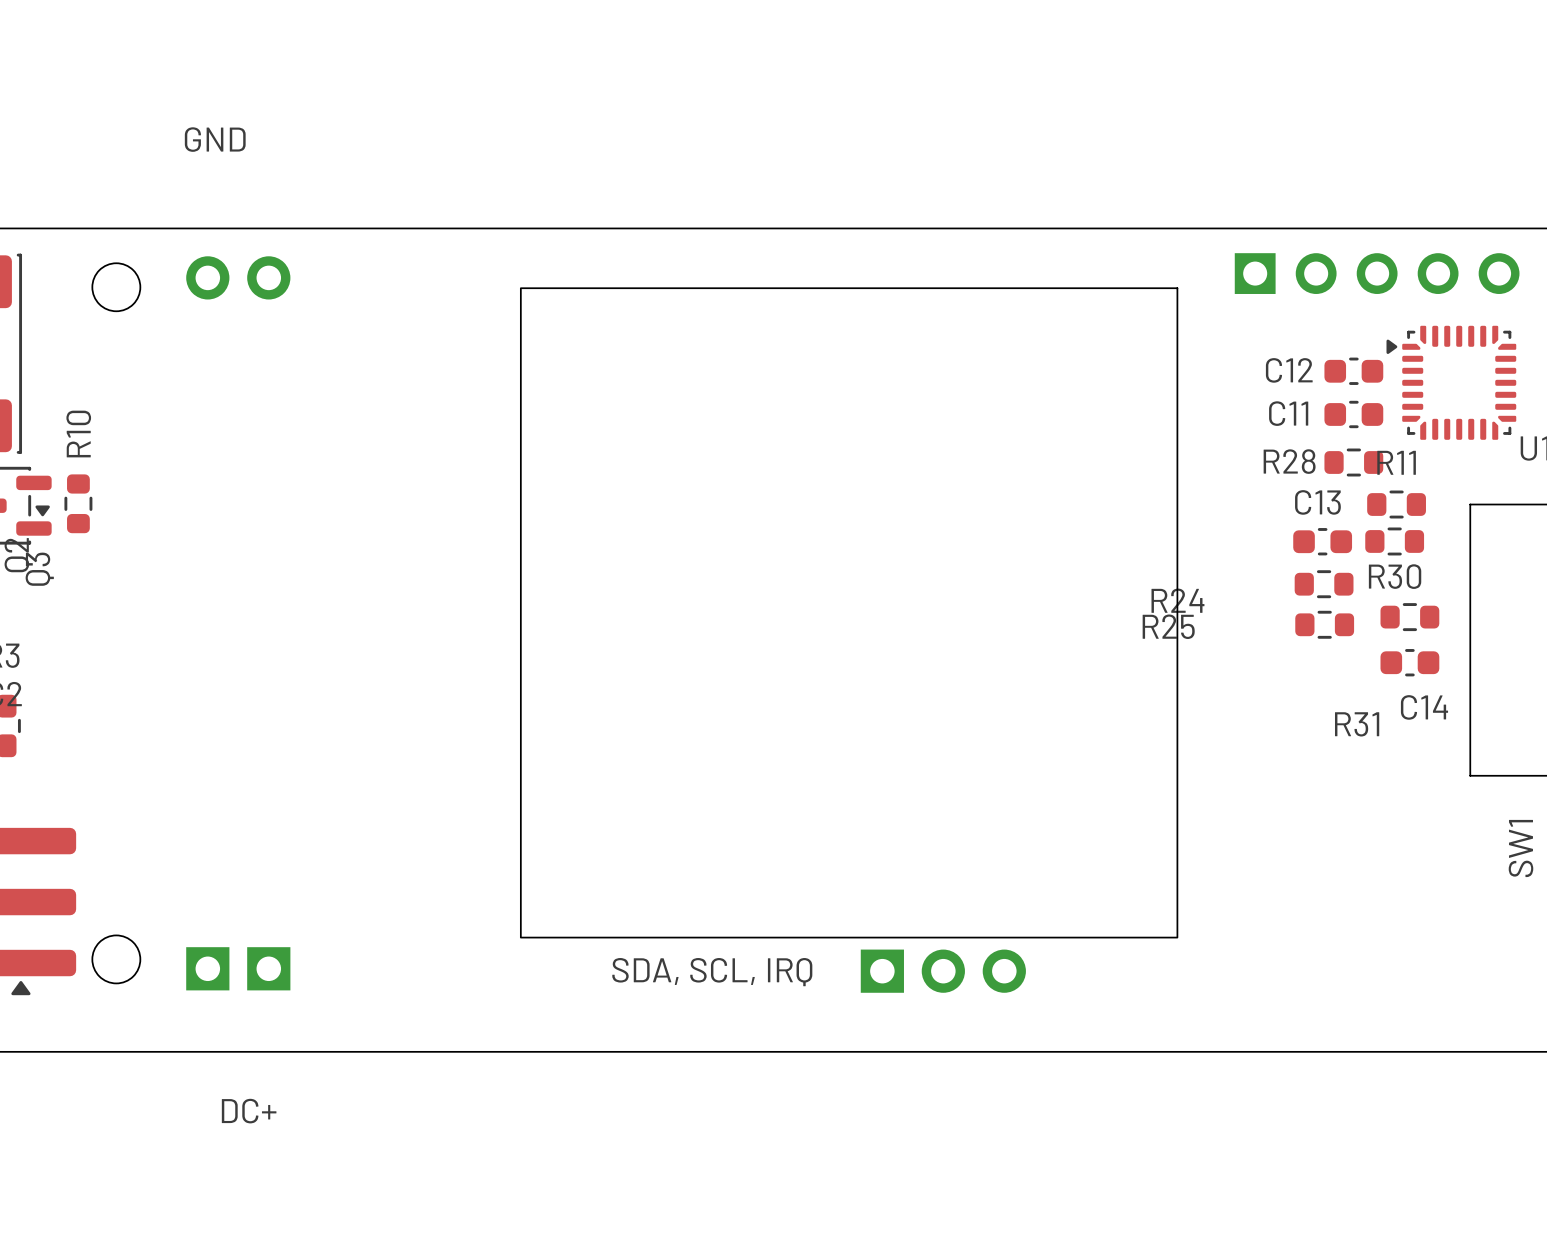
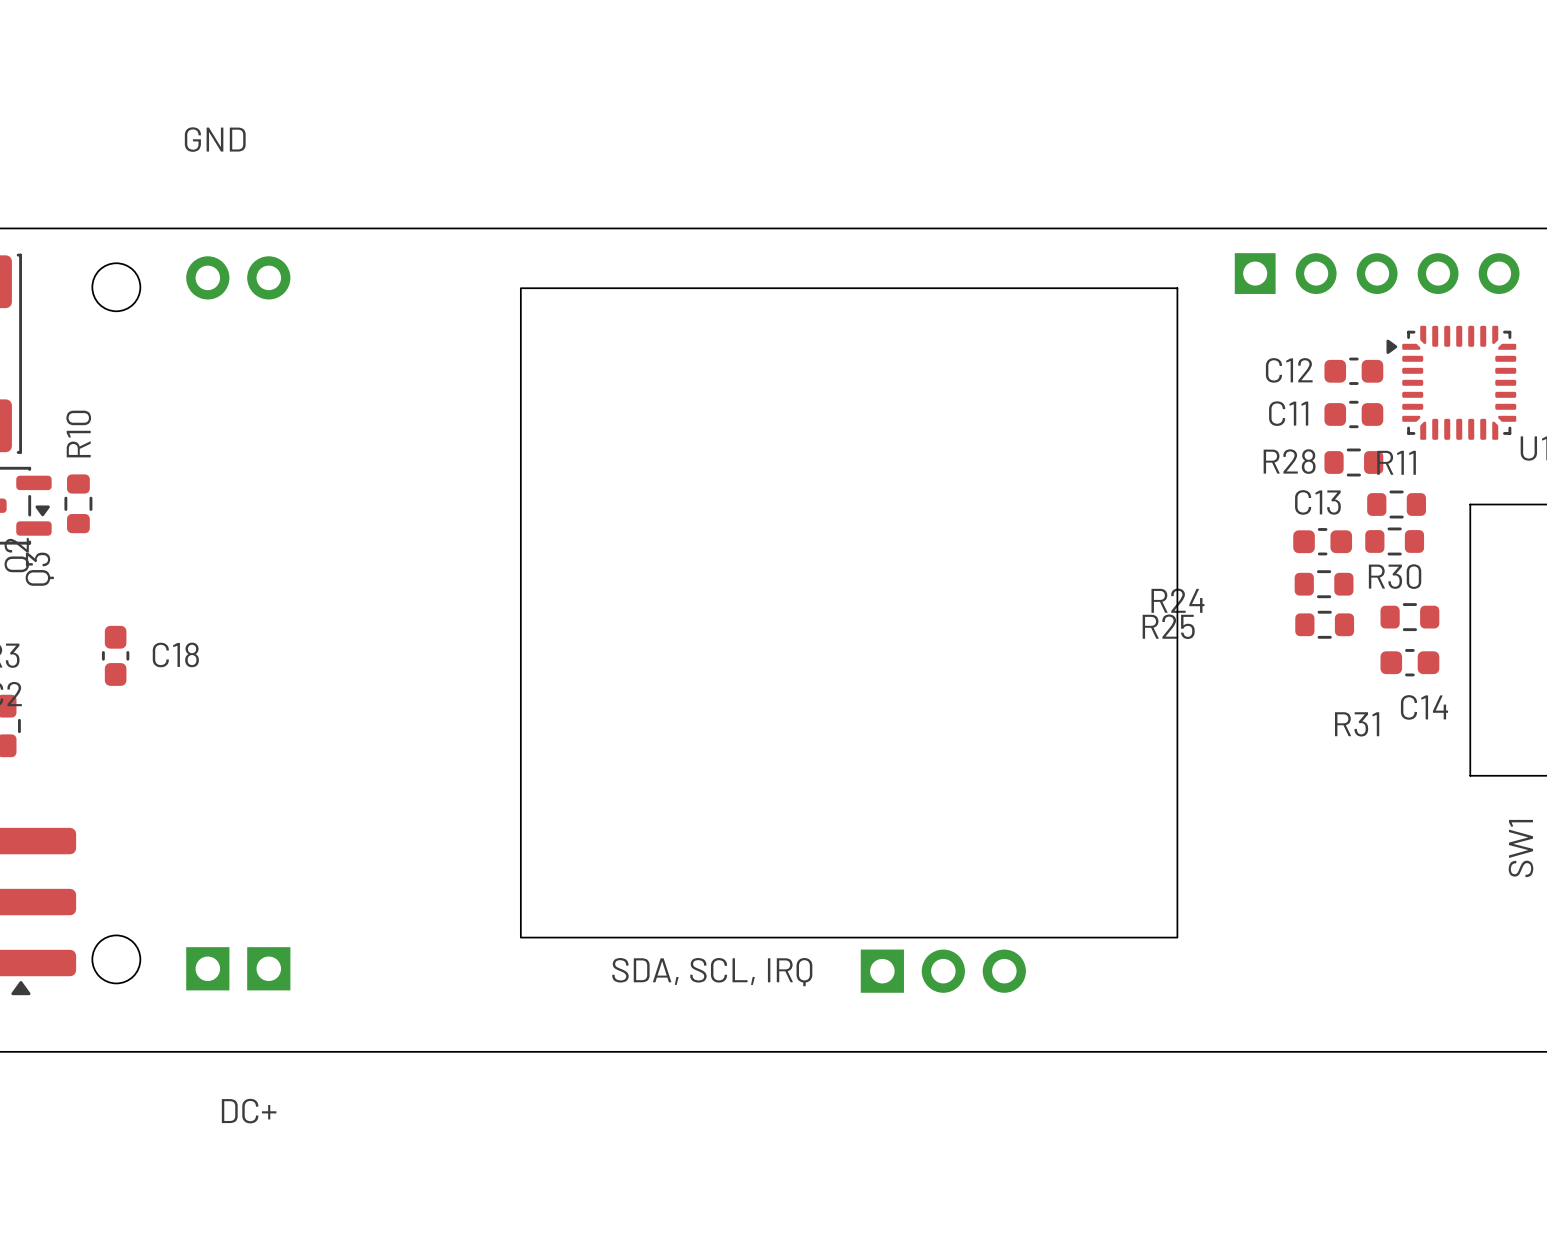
C18: none -> (115, 655)

